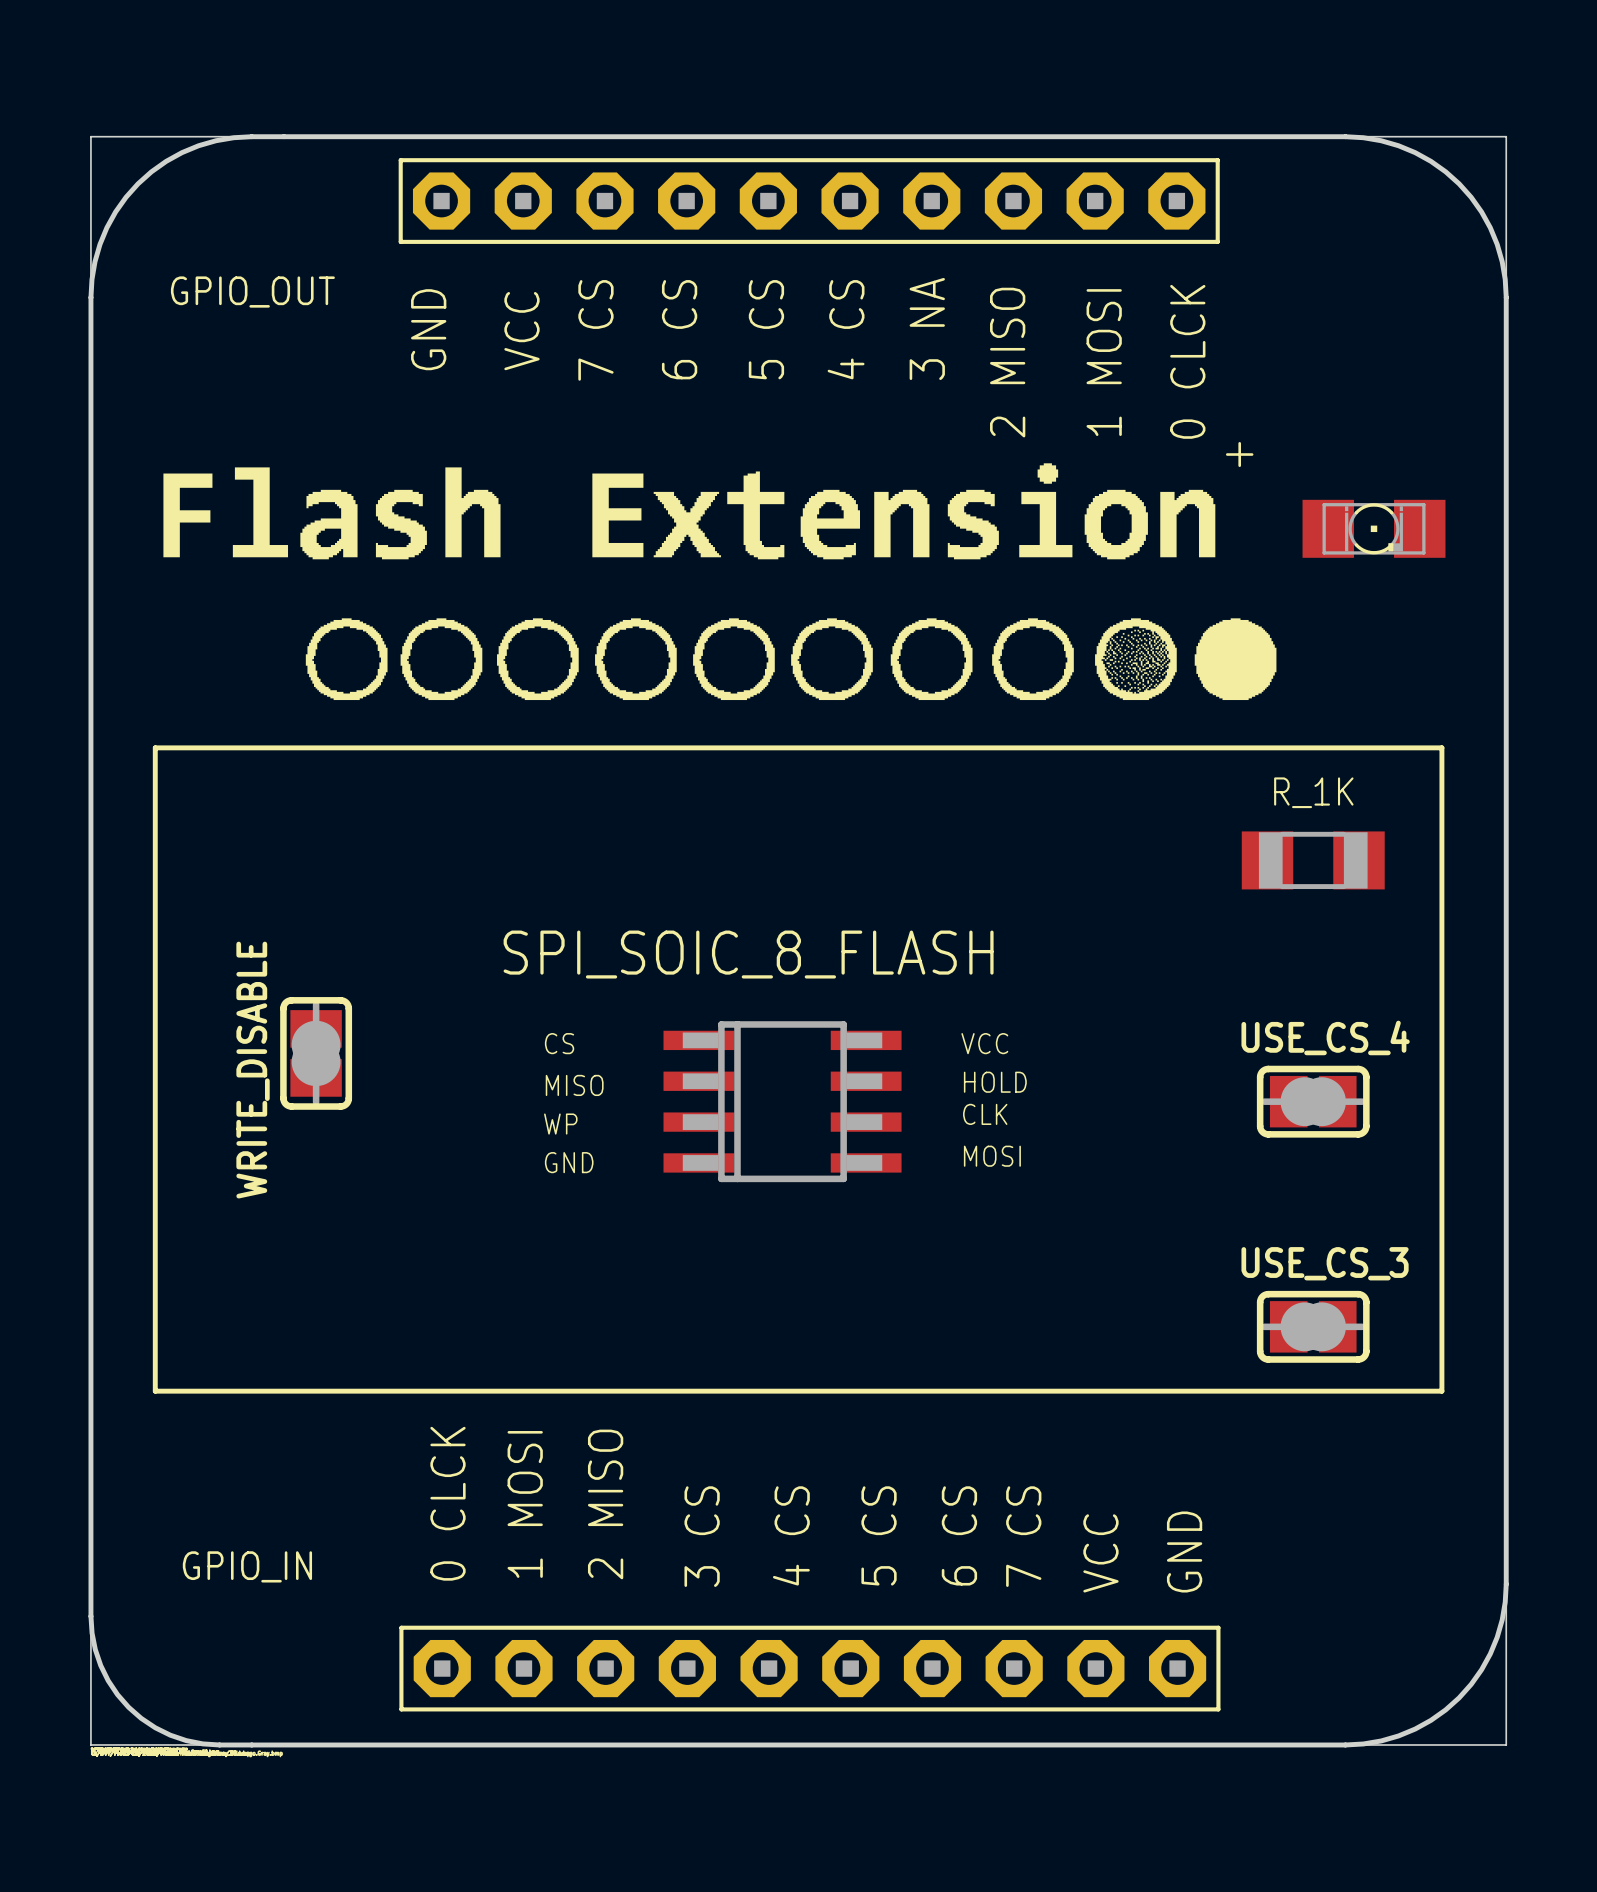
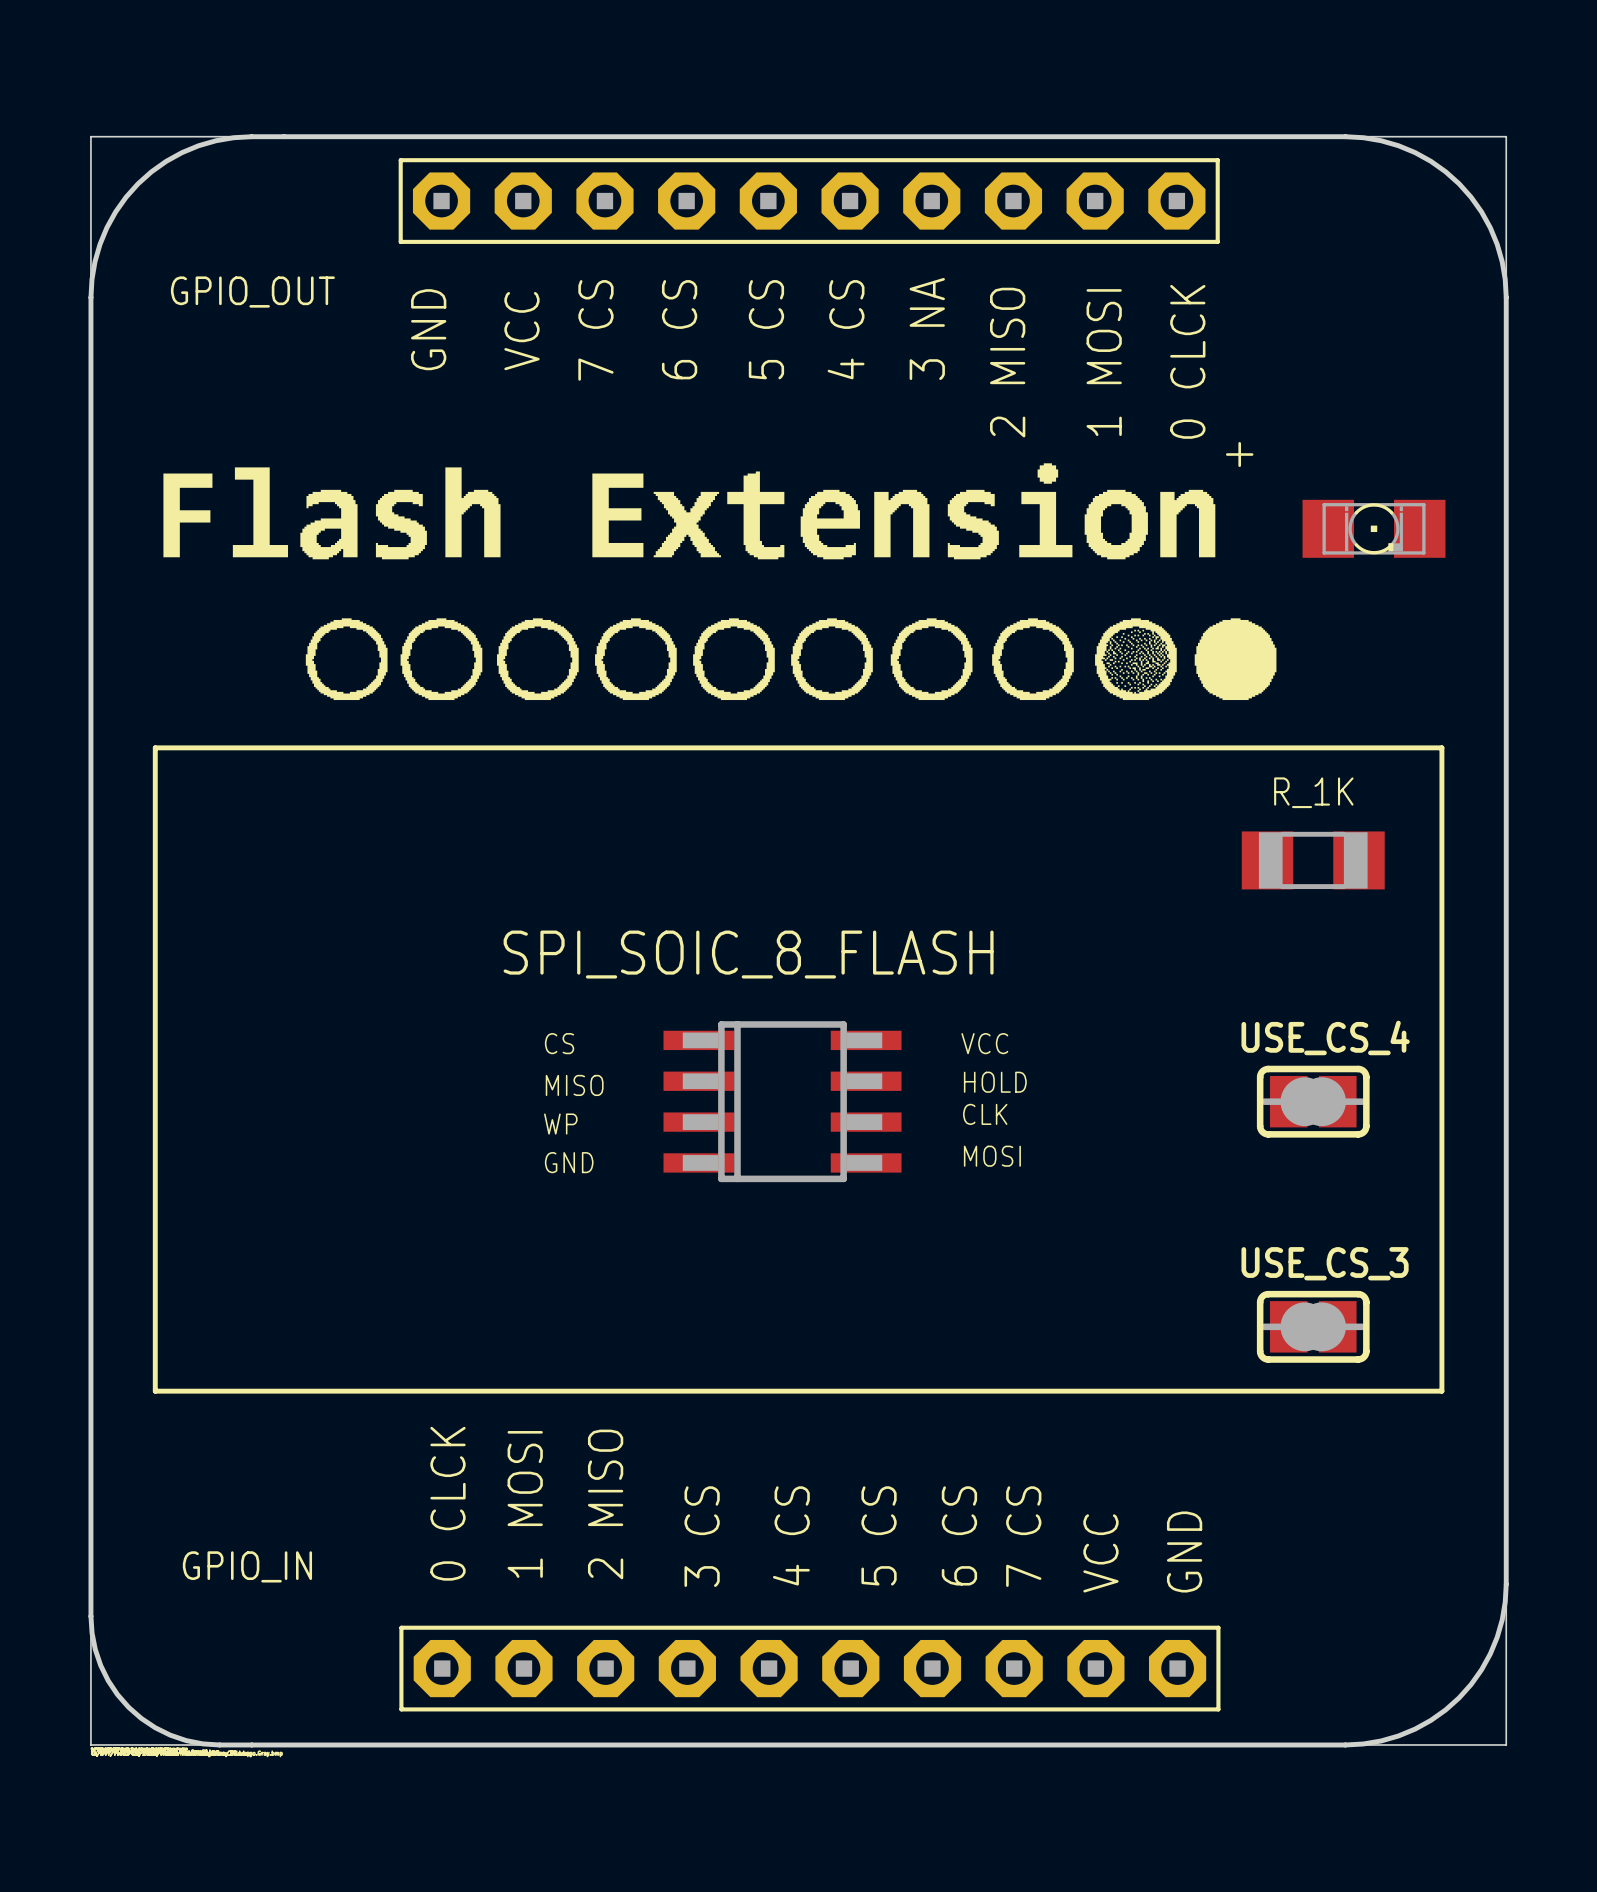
WRITE_DISABLE: (316, 1053) -> none

